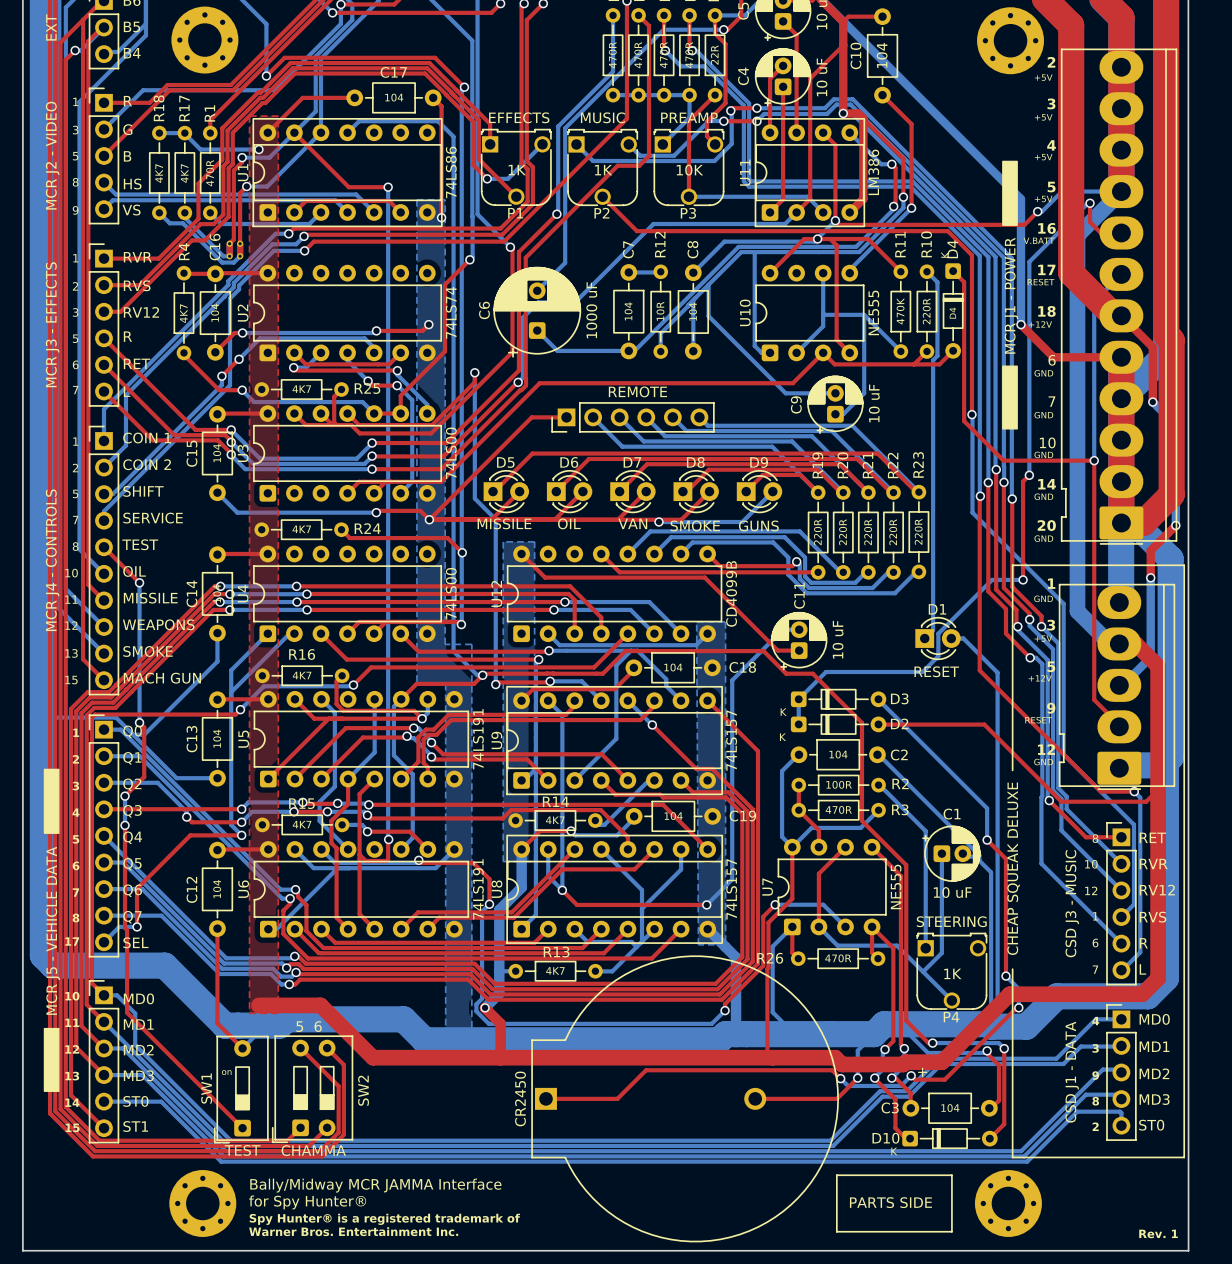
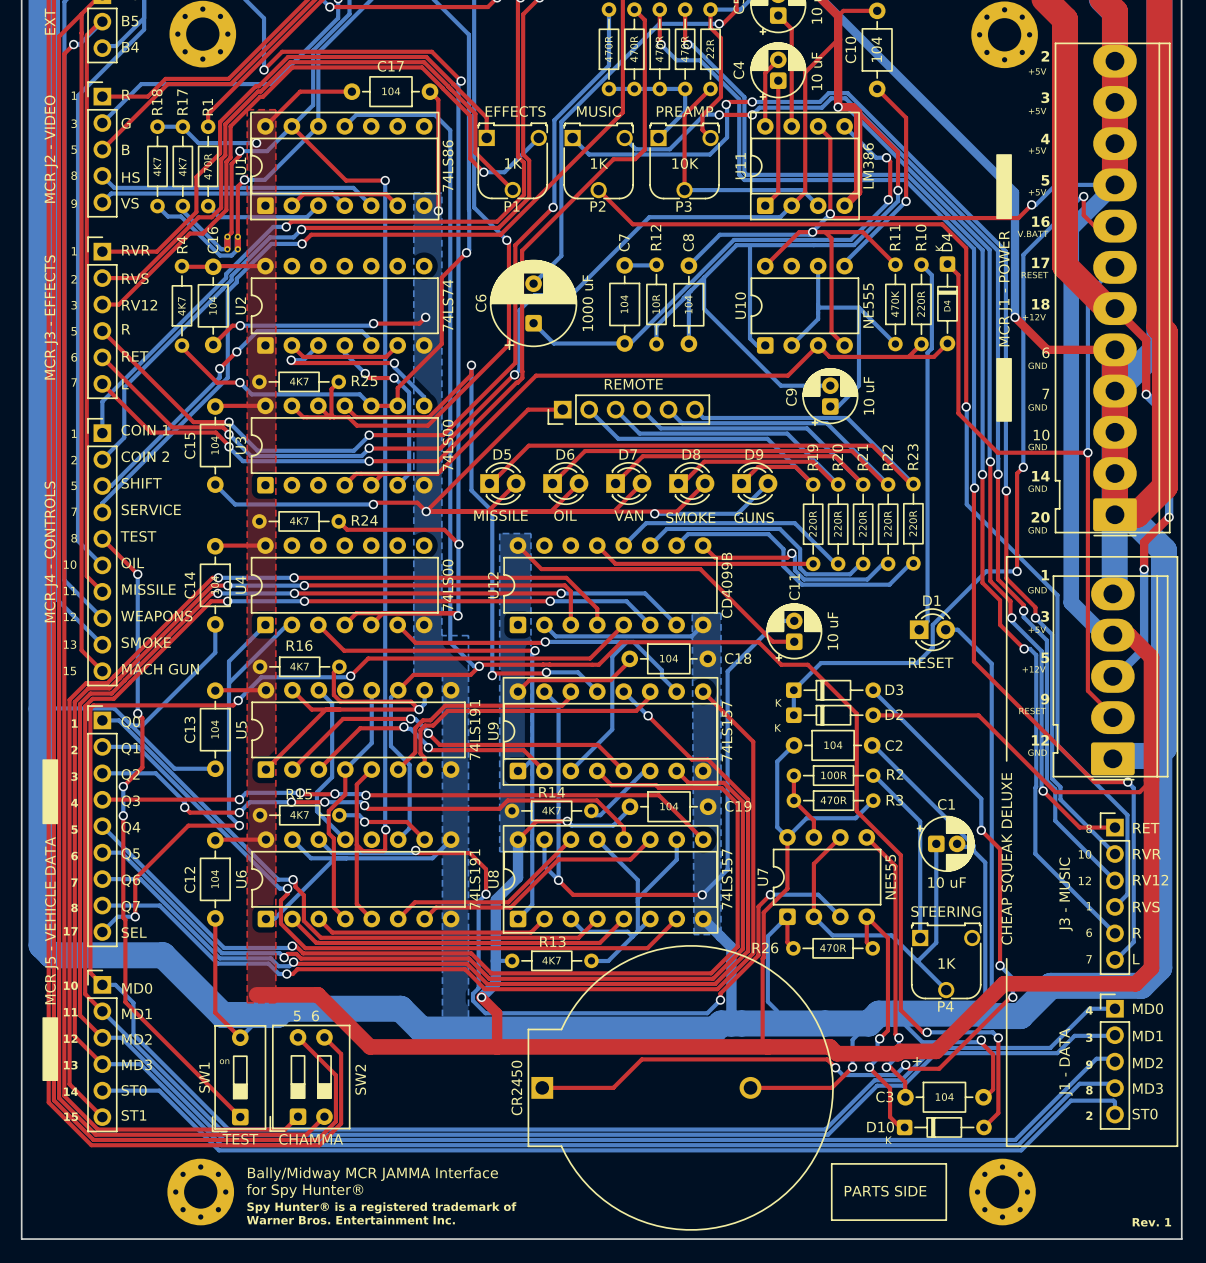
text: CSD J3 - MUSIC (1072, 903) -> J3 - MUSIC (1066, 894)
text: CSD J1 - DATA (1072, 1072) -> J1 - DATA (1066, 1062)

